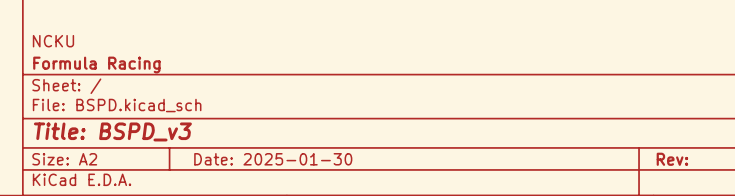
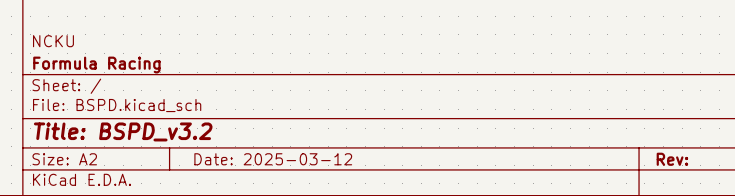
title block: Title: BSPD_v3 (112, 131) -> Title: BSPD_v3.2 (123, 131)
title block: Date: 2025-01-30 (273, 159) -> Date: 2025-03-12 (273, 159)

